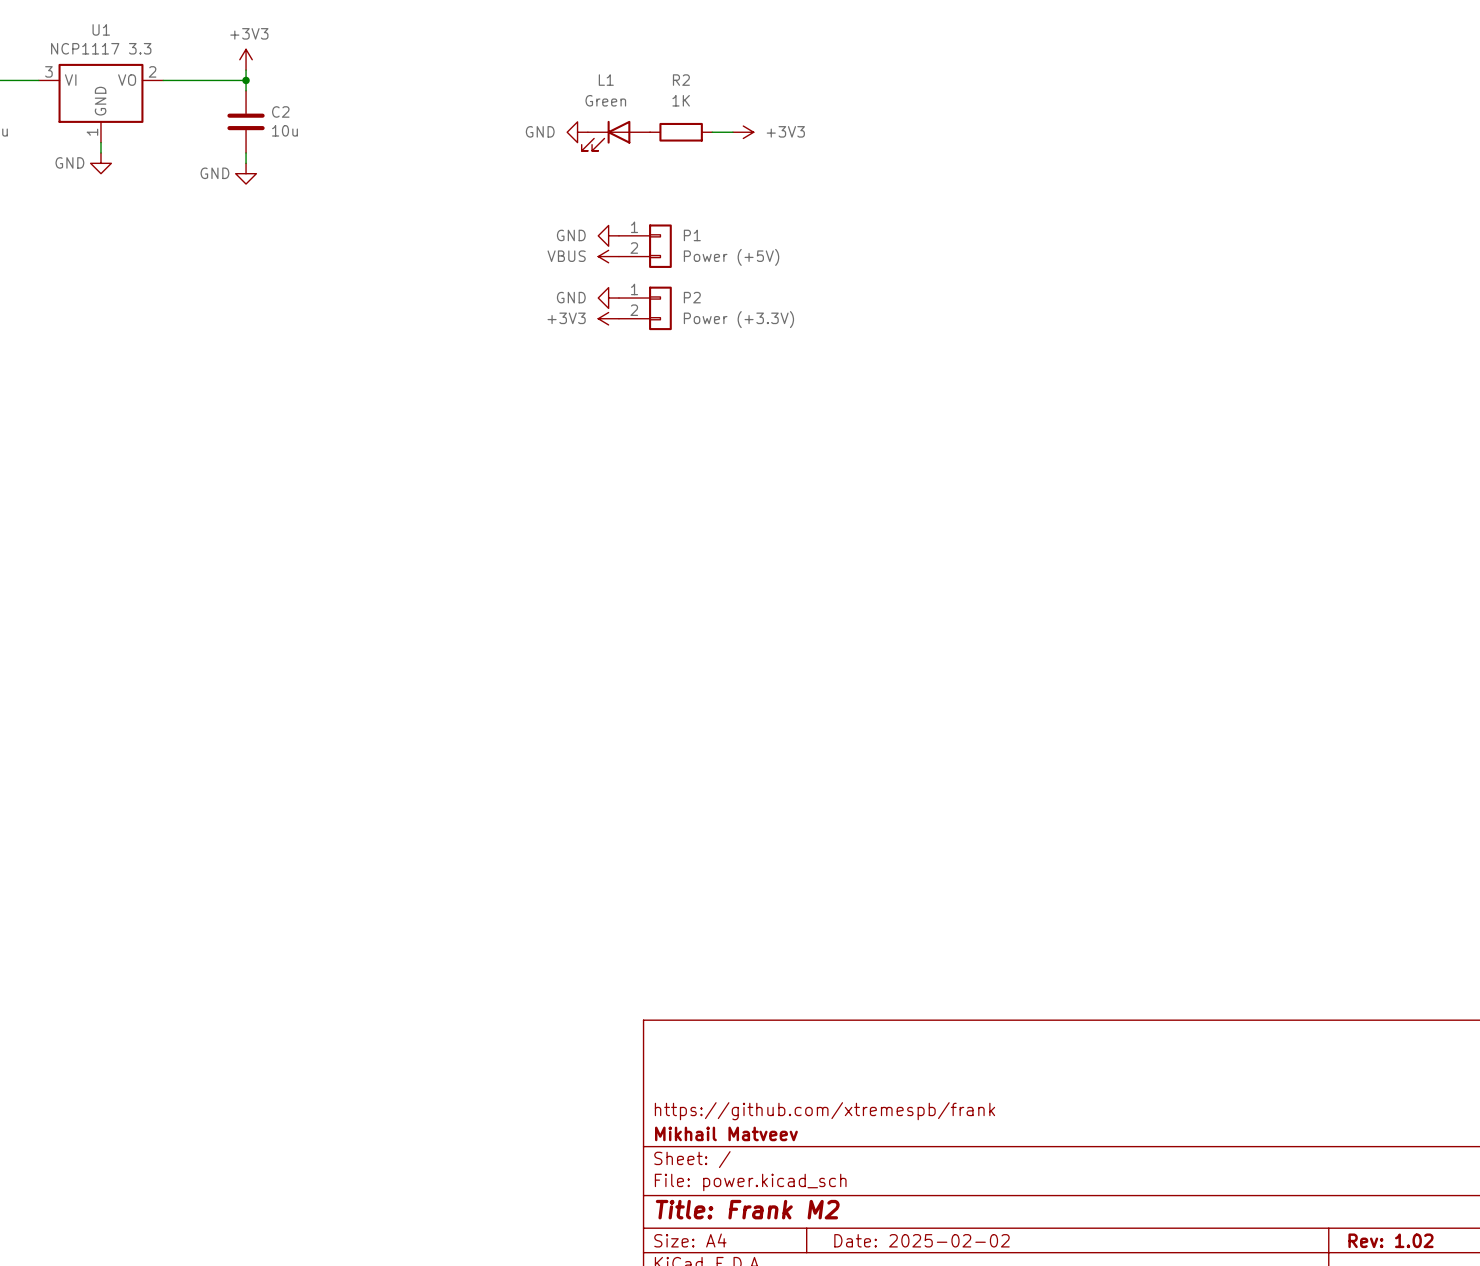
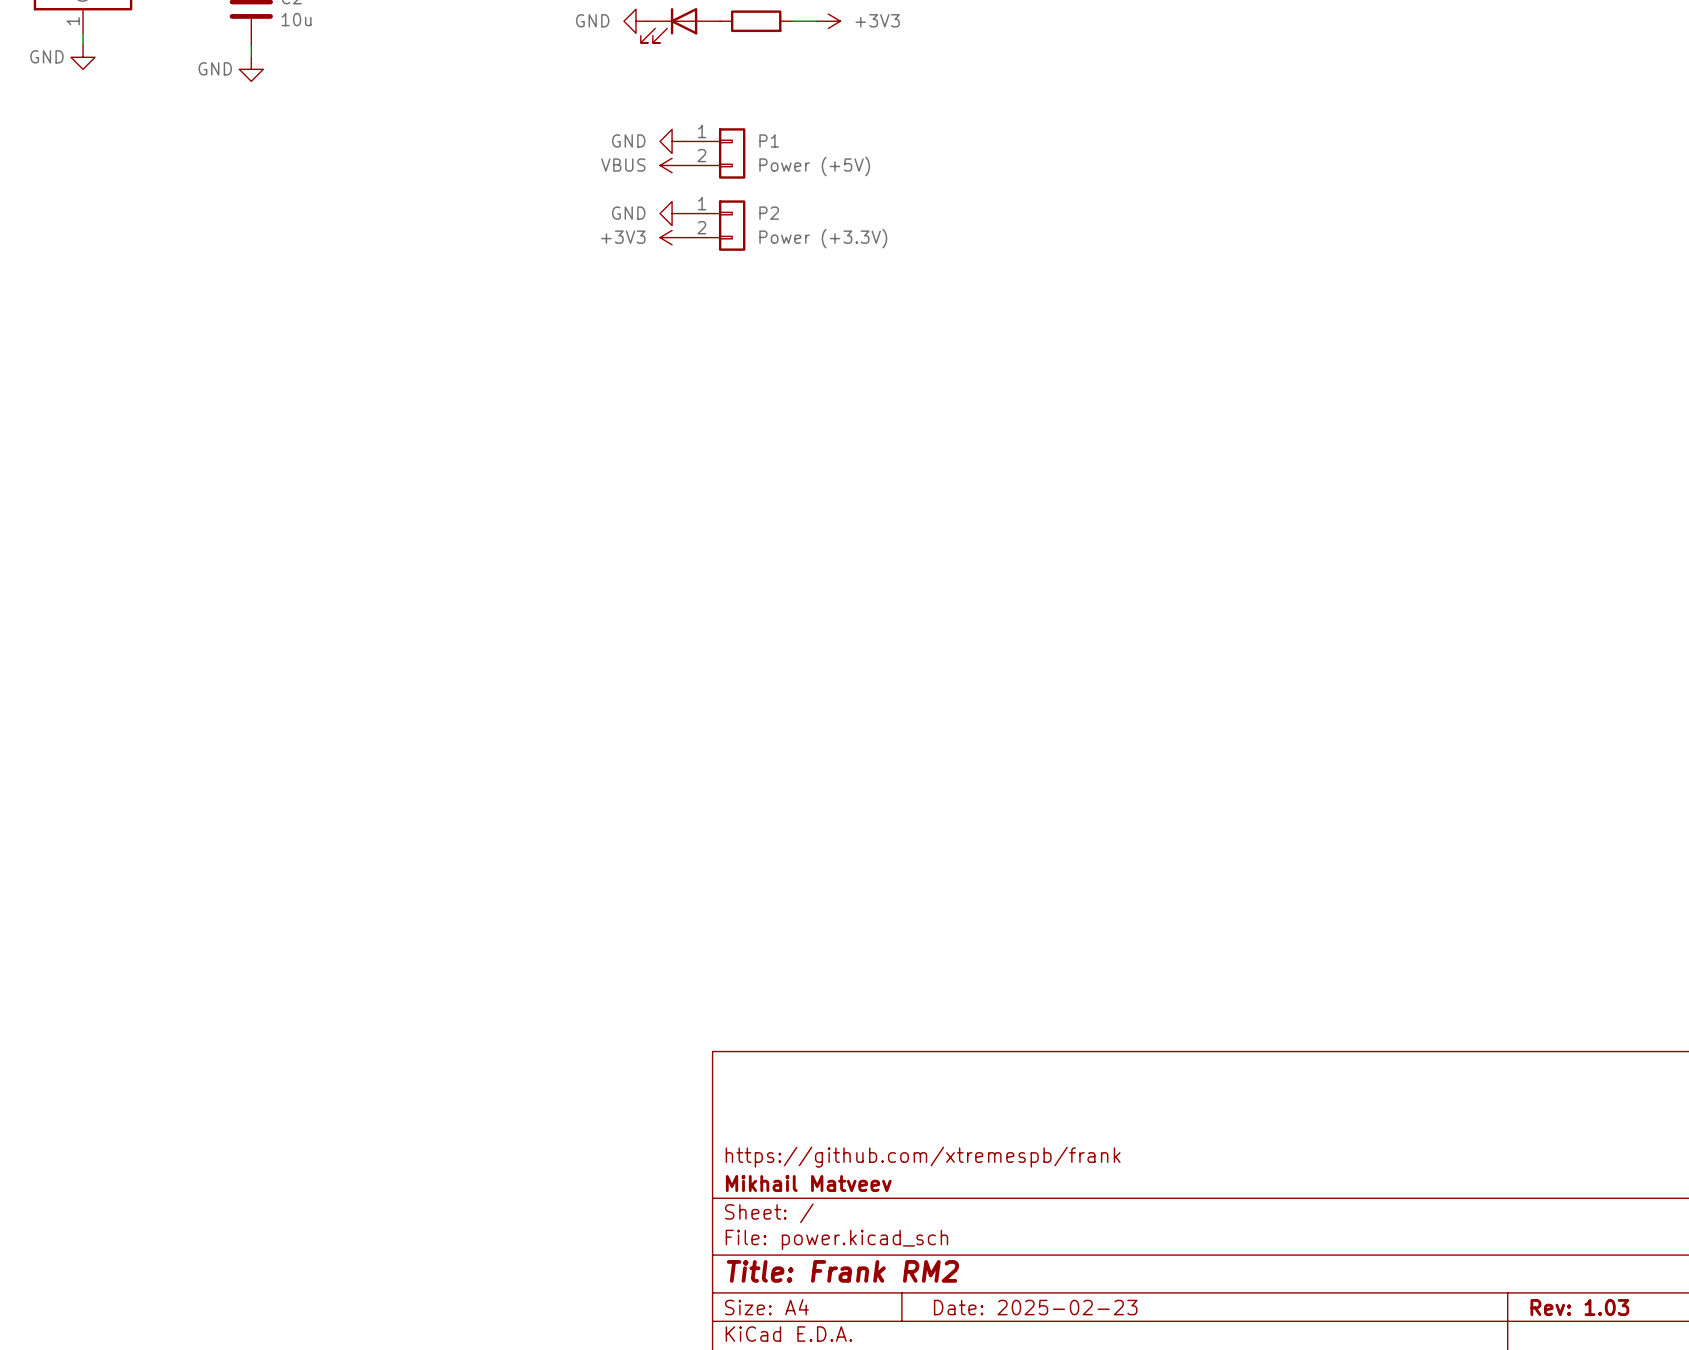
title block: Title: Frank M2 (747, 1209) -> Title: Frank RM2 (842, 1271)
title block: Date: 2025-02-02 (922, 1240) -> Date: 2025-02-23 (1035, 1307)
title block: Rev: 1.02 (1390, 1240) -> Rev: 1.03 (1579, 1307)

